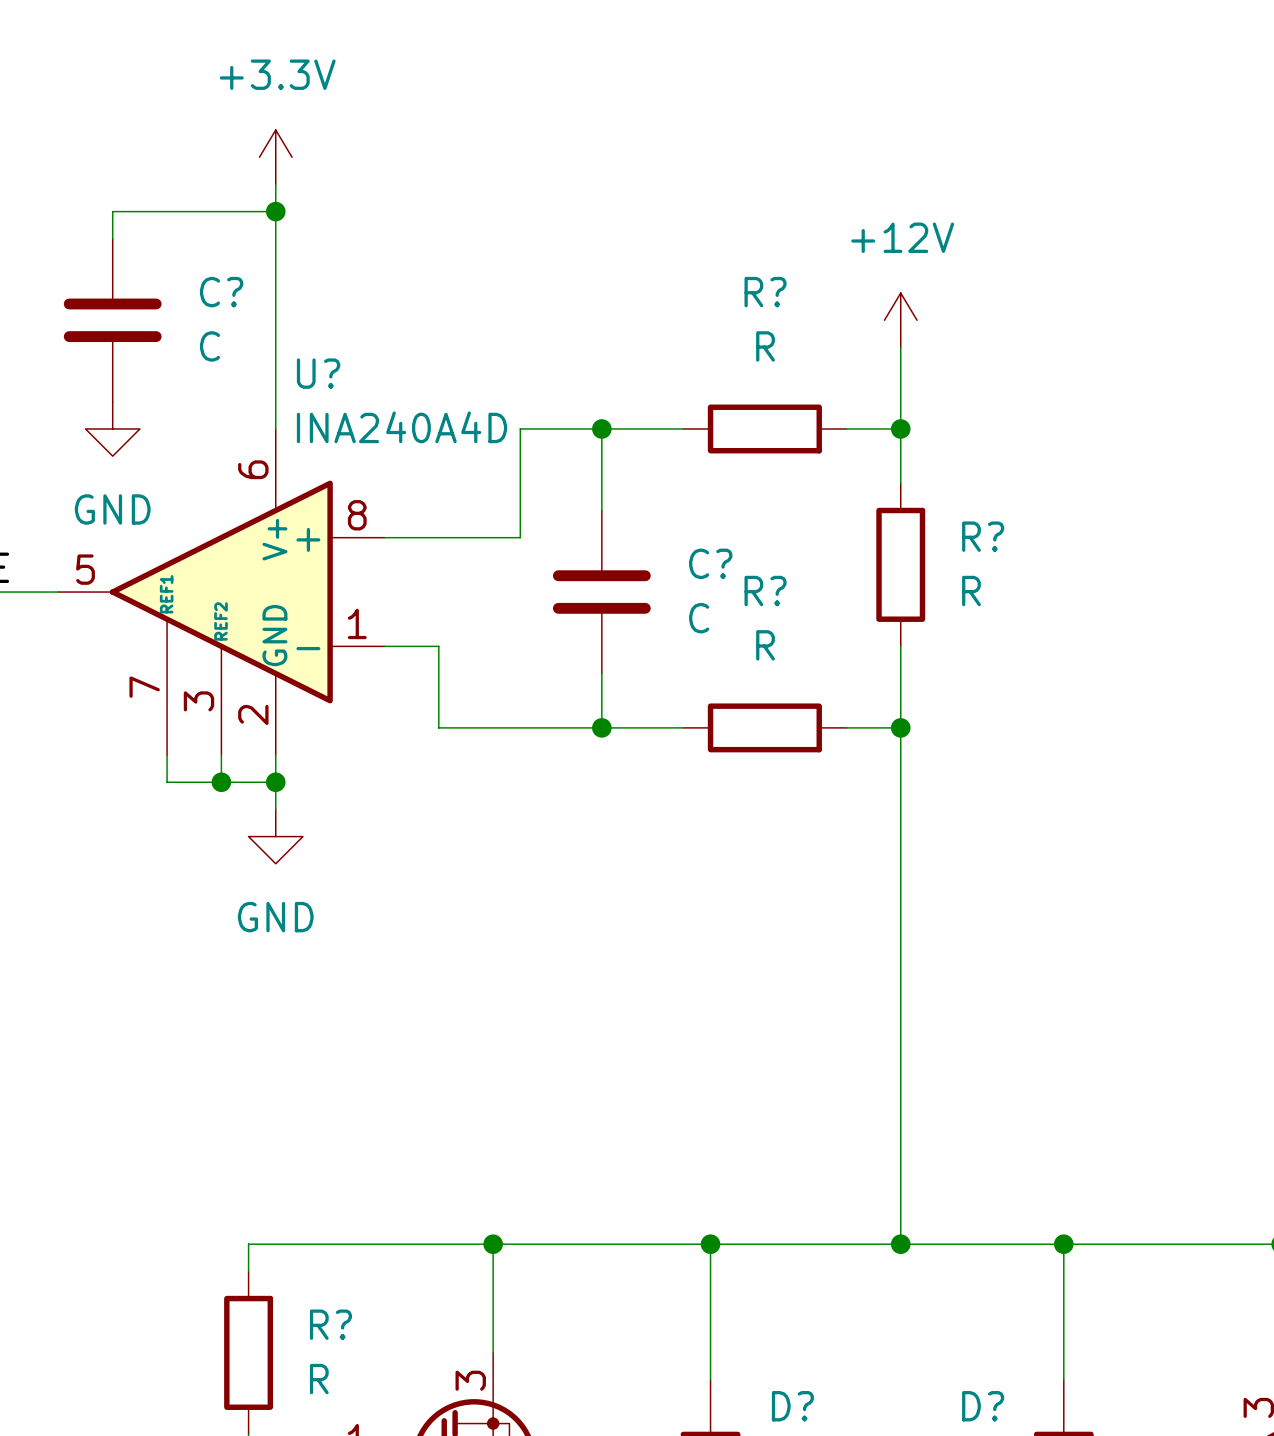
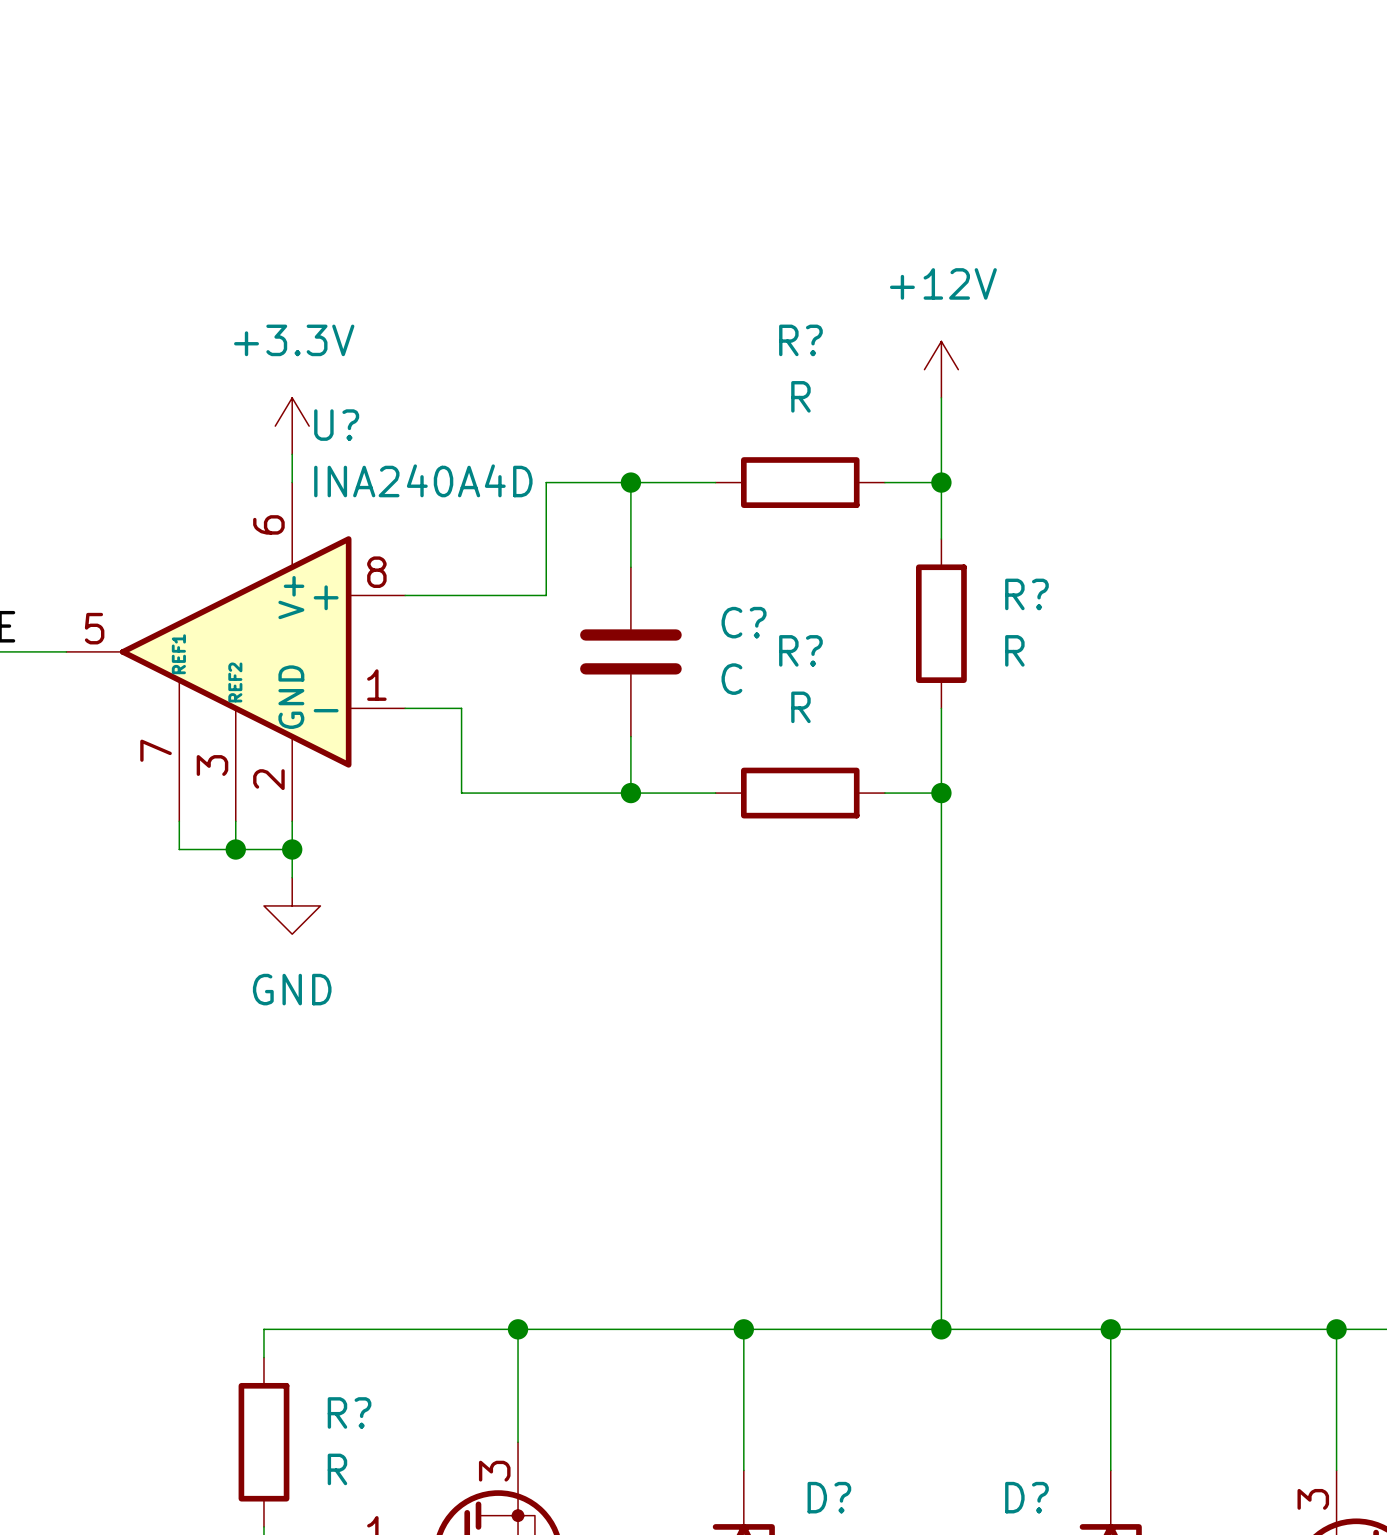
power symbol position: +3.3V (275, 157) -> +3.3V (292, 426)
wire: (275, 184) (275, 401) -> none
wire: (275, 211) (112, 211) (112, 238) -> none
junction: (275, 211) -> none
C?: C (112, 320) -> none
power symbol: GND (112, 428) -> none

